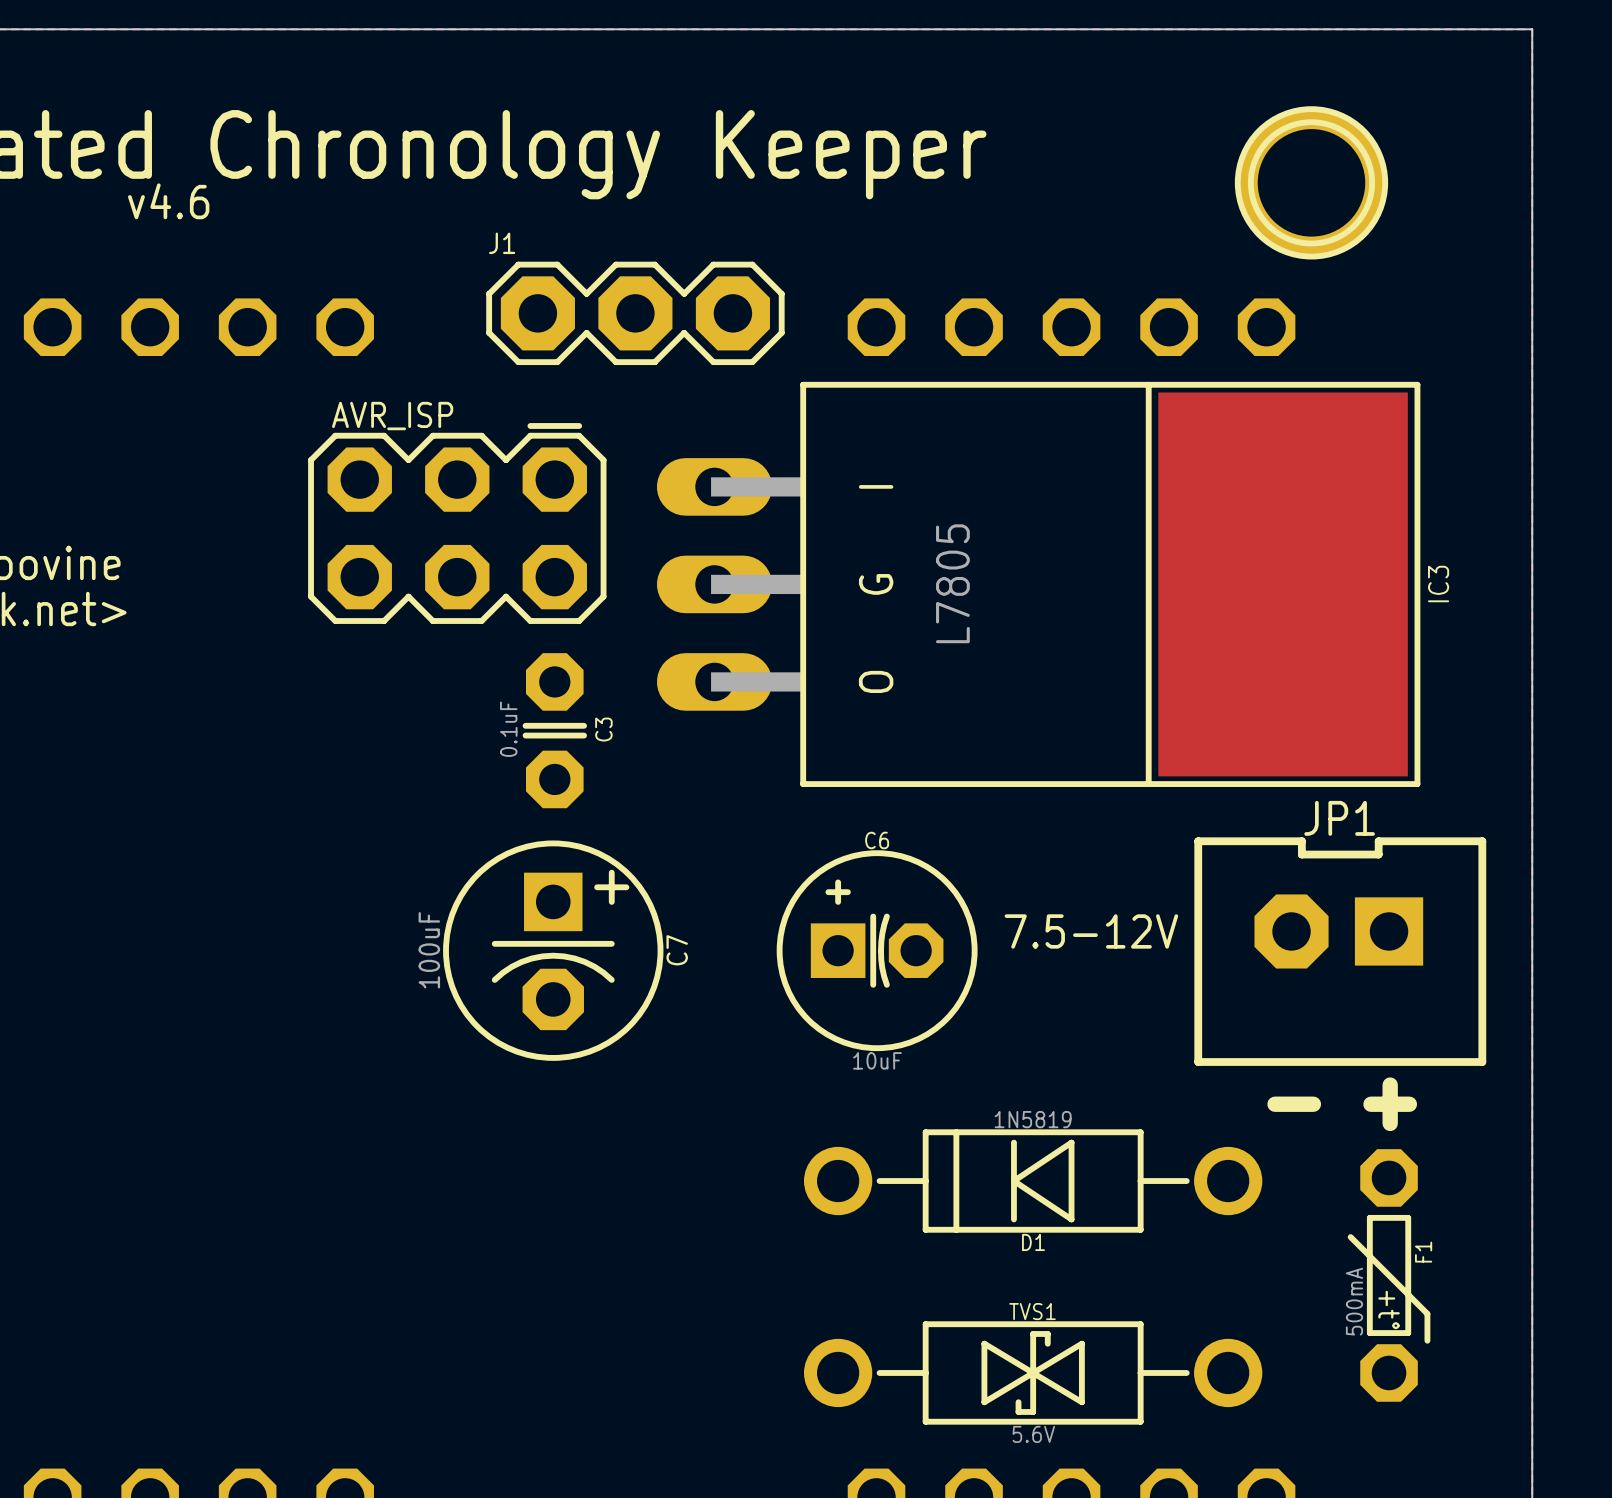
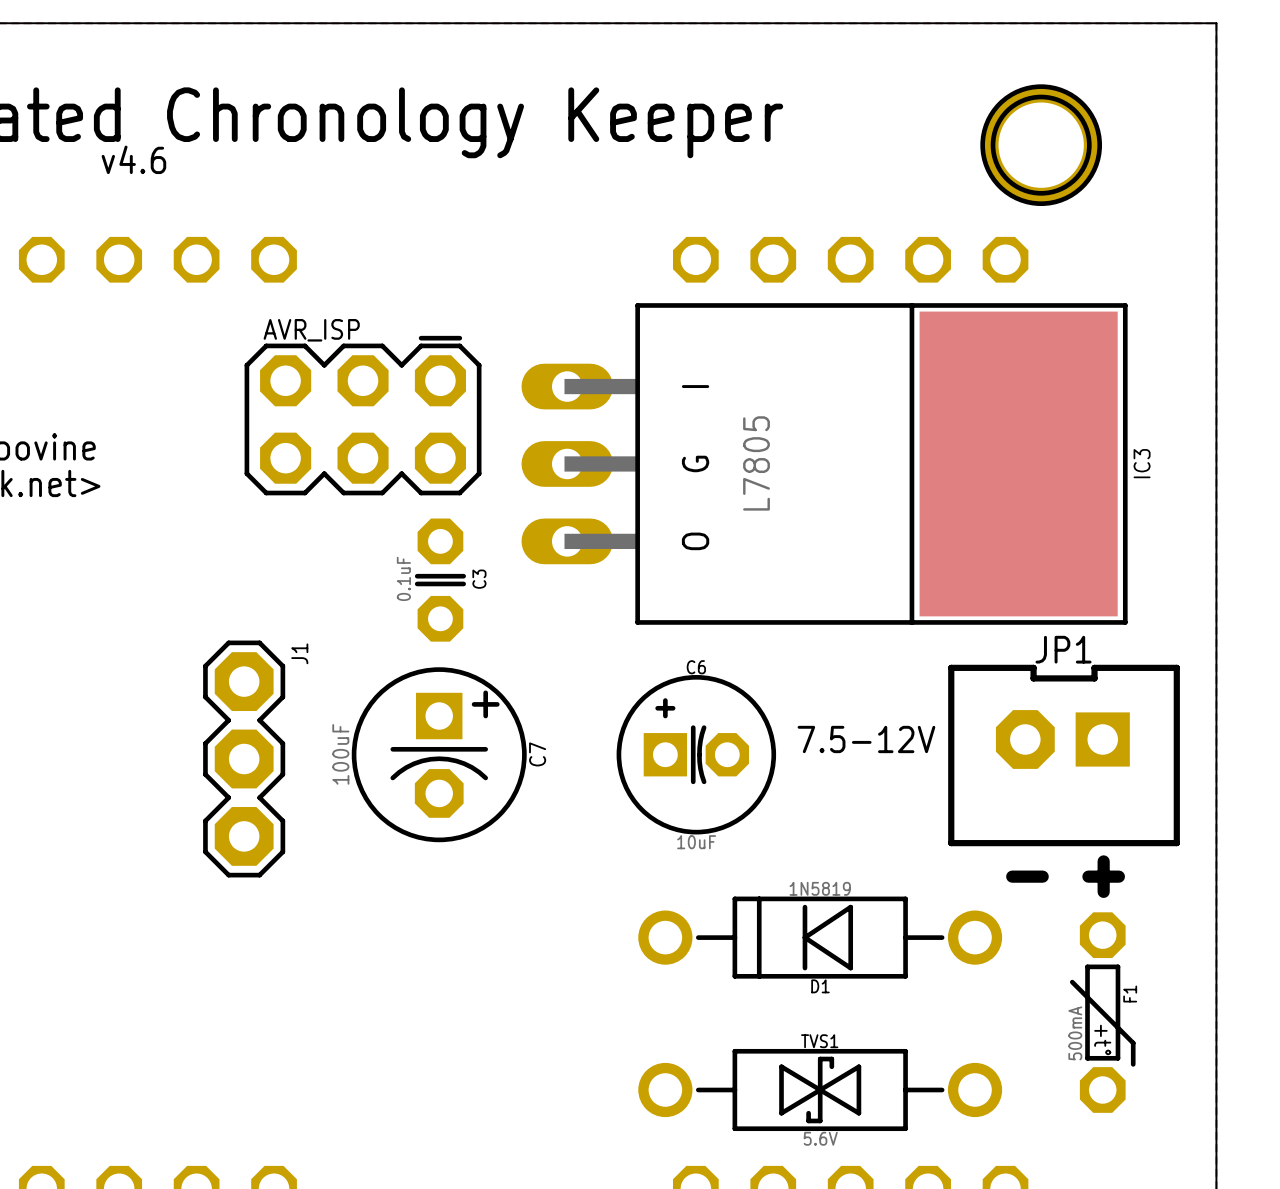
J1 rotation: 0° (635, 313) -> 90° clockwise (244, 759)
J1 position: (635, 313) -> (244, 759)

